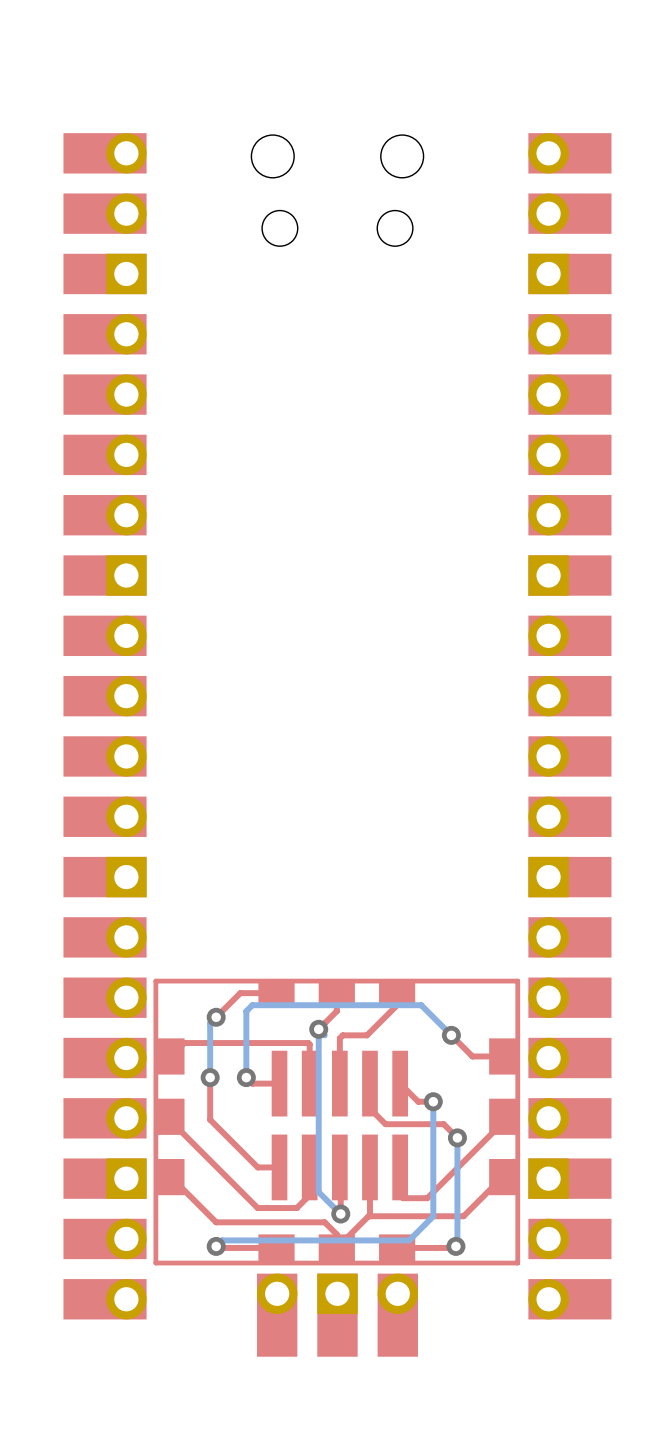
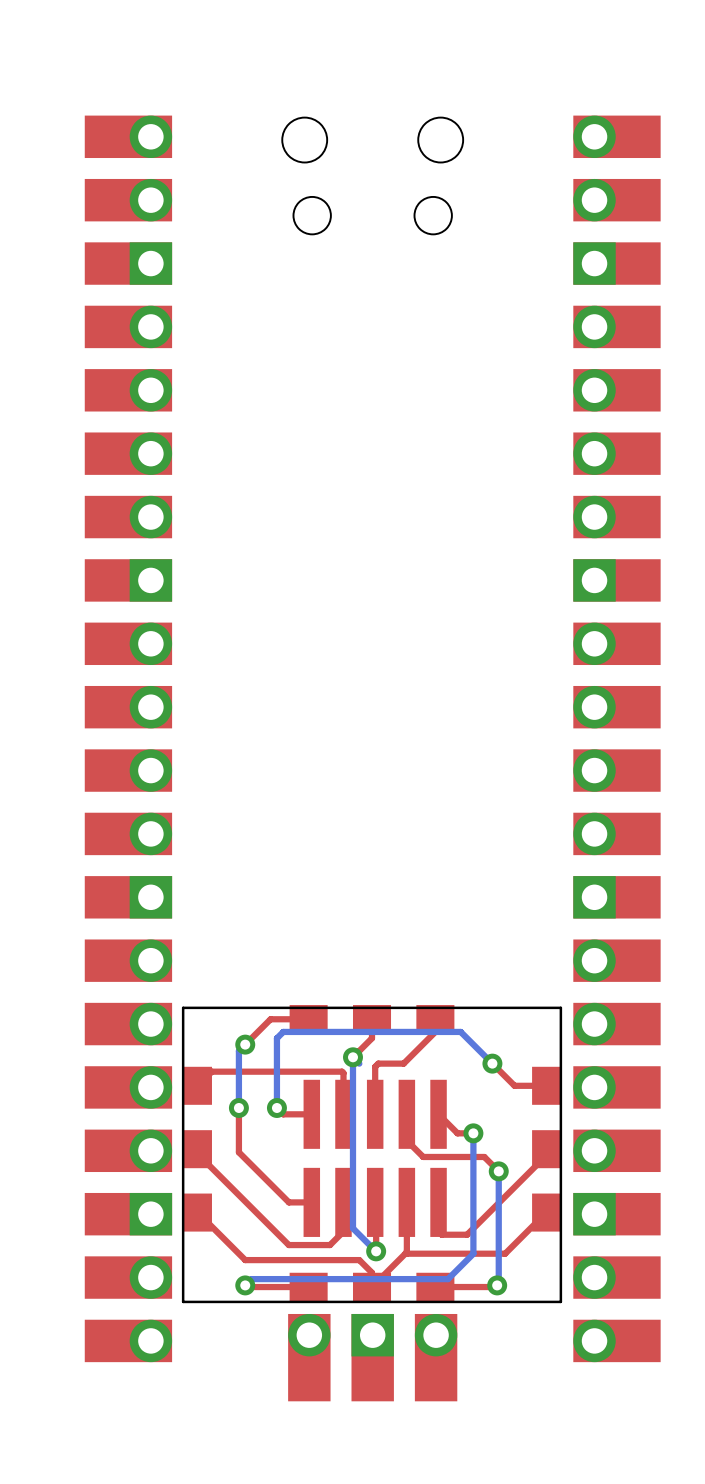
top track: (517, 981) (155, 981) (155, 1263) (517, 1263) (517, 981) -> none
board edge: none -> (560, 1007) (183, 1007) (183, 1301) (560, 1301) (560, 1007)

